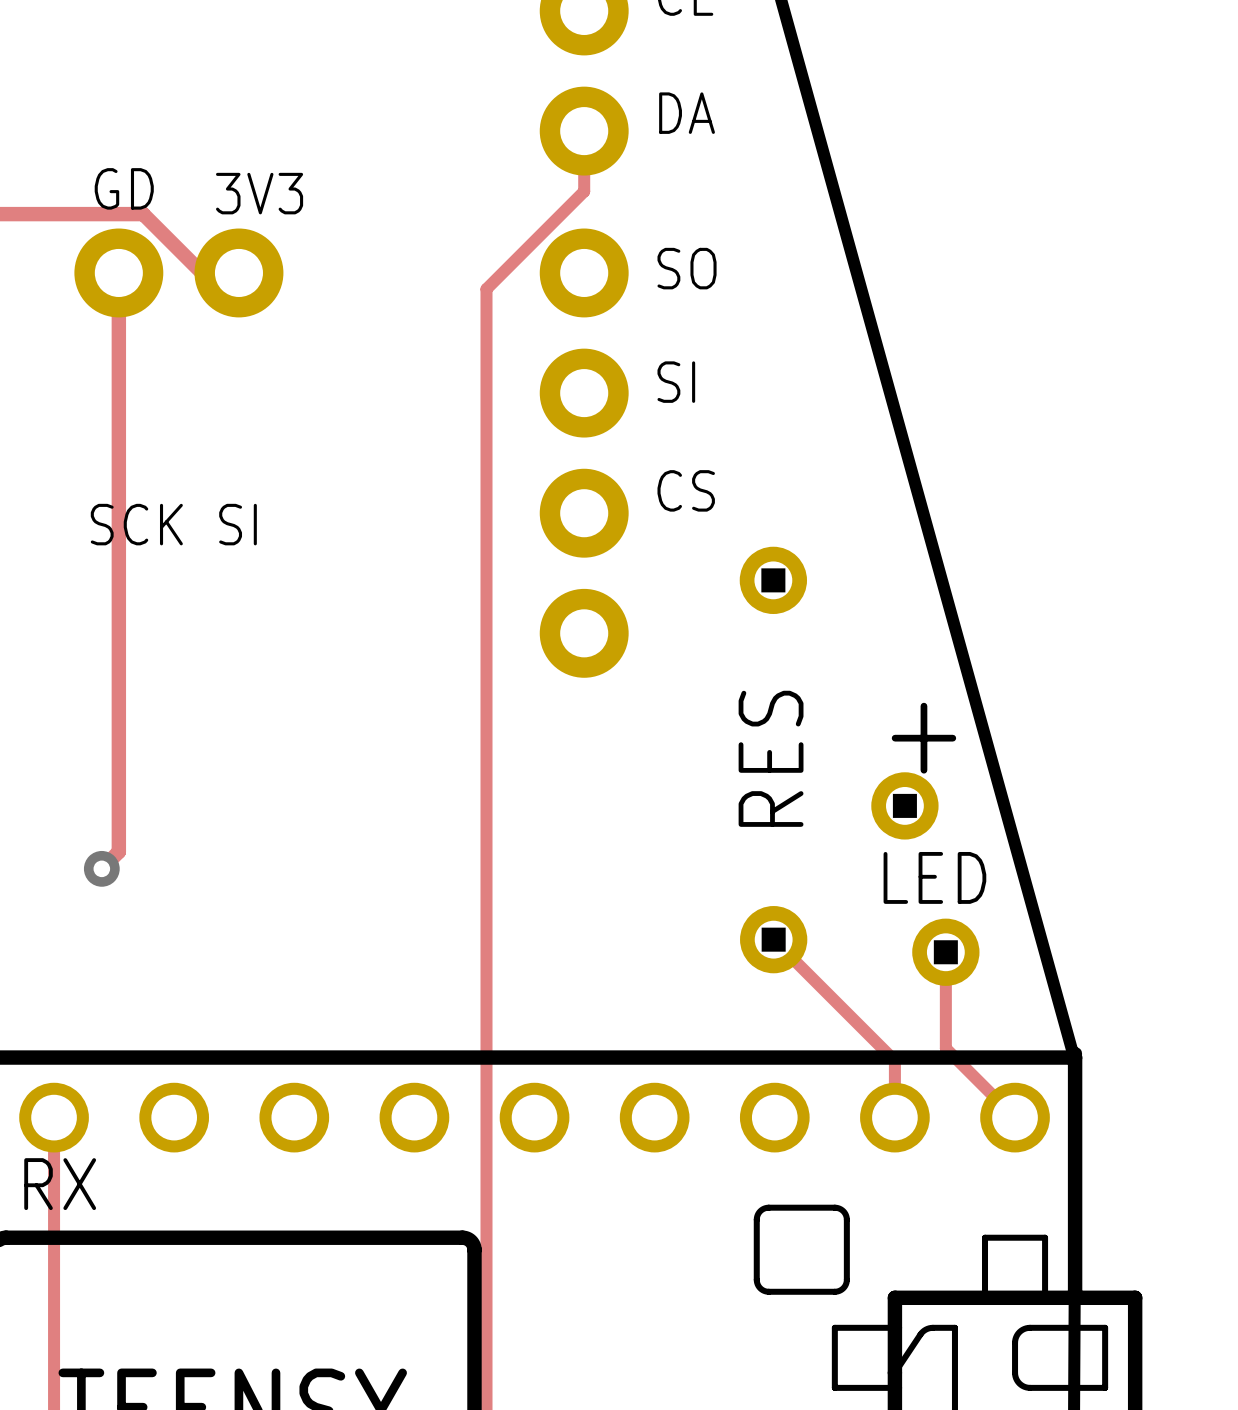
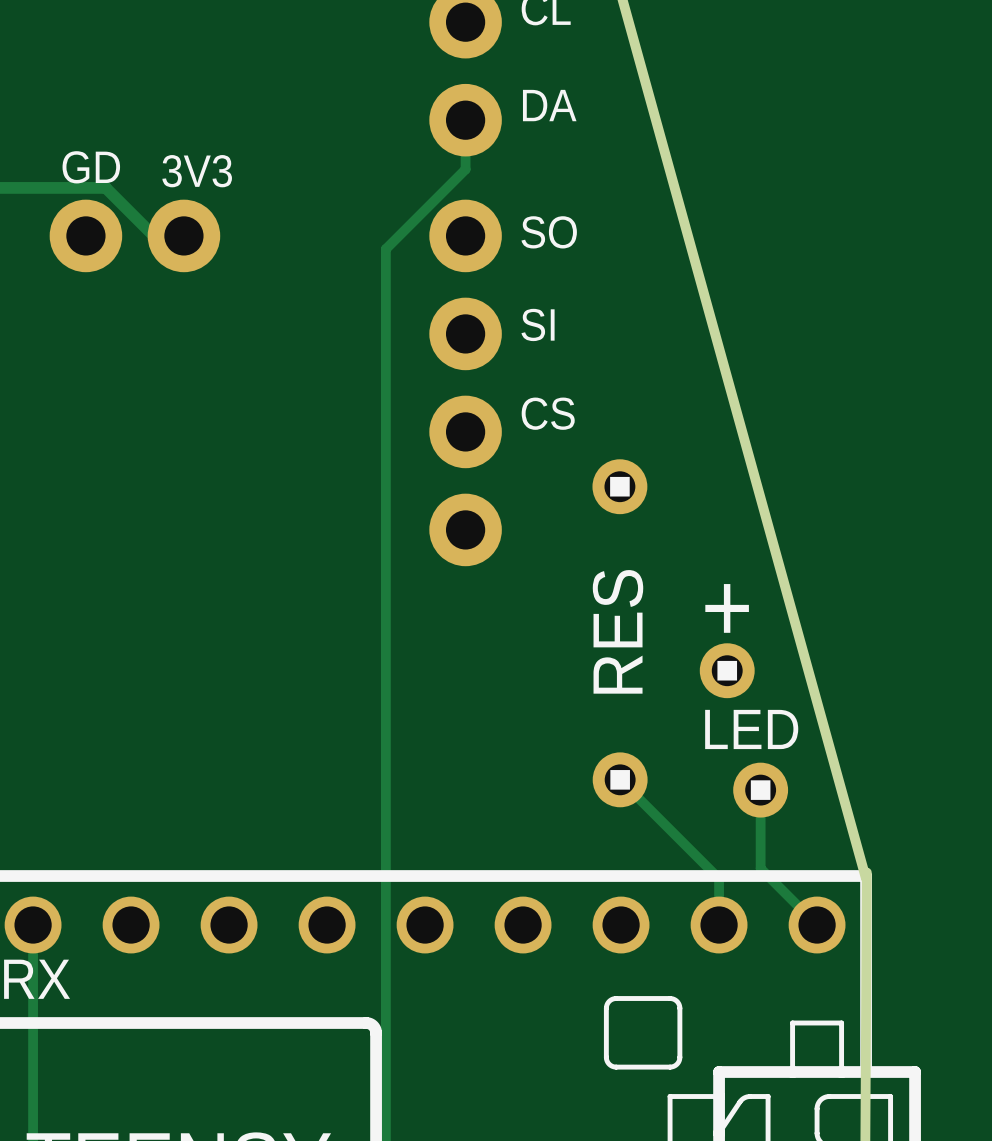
track: (118, 272) (118, 851) (101, 868) -> none
text: SCK (136, 524) -> none
text: SI (238, 524) -> none
via: (101, 868) -> none

